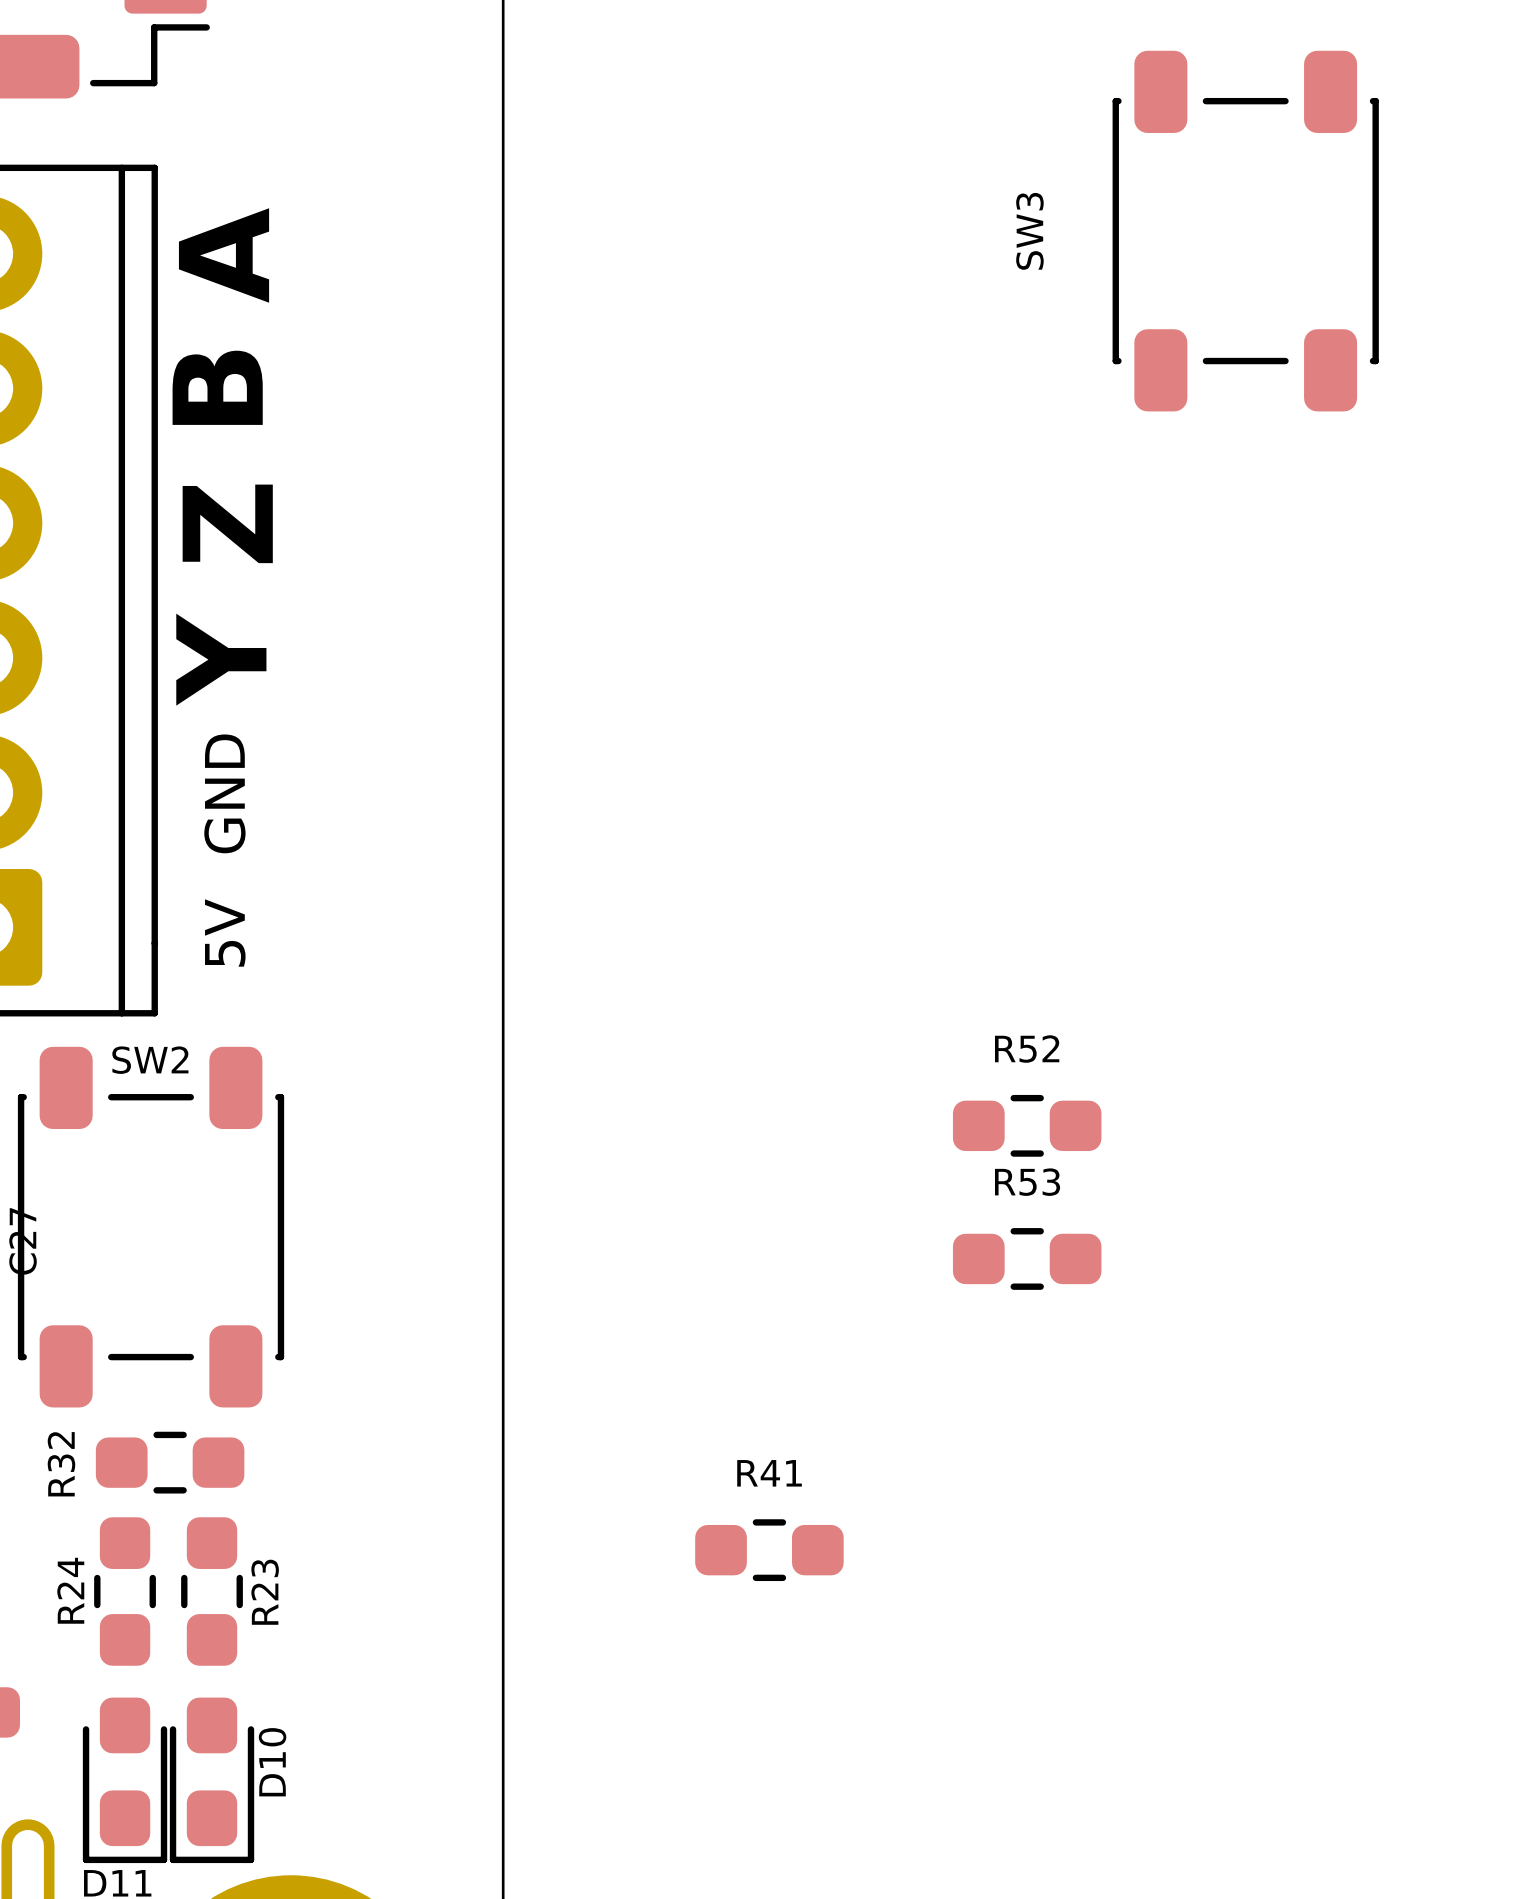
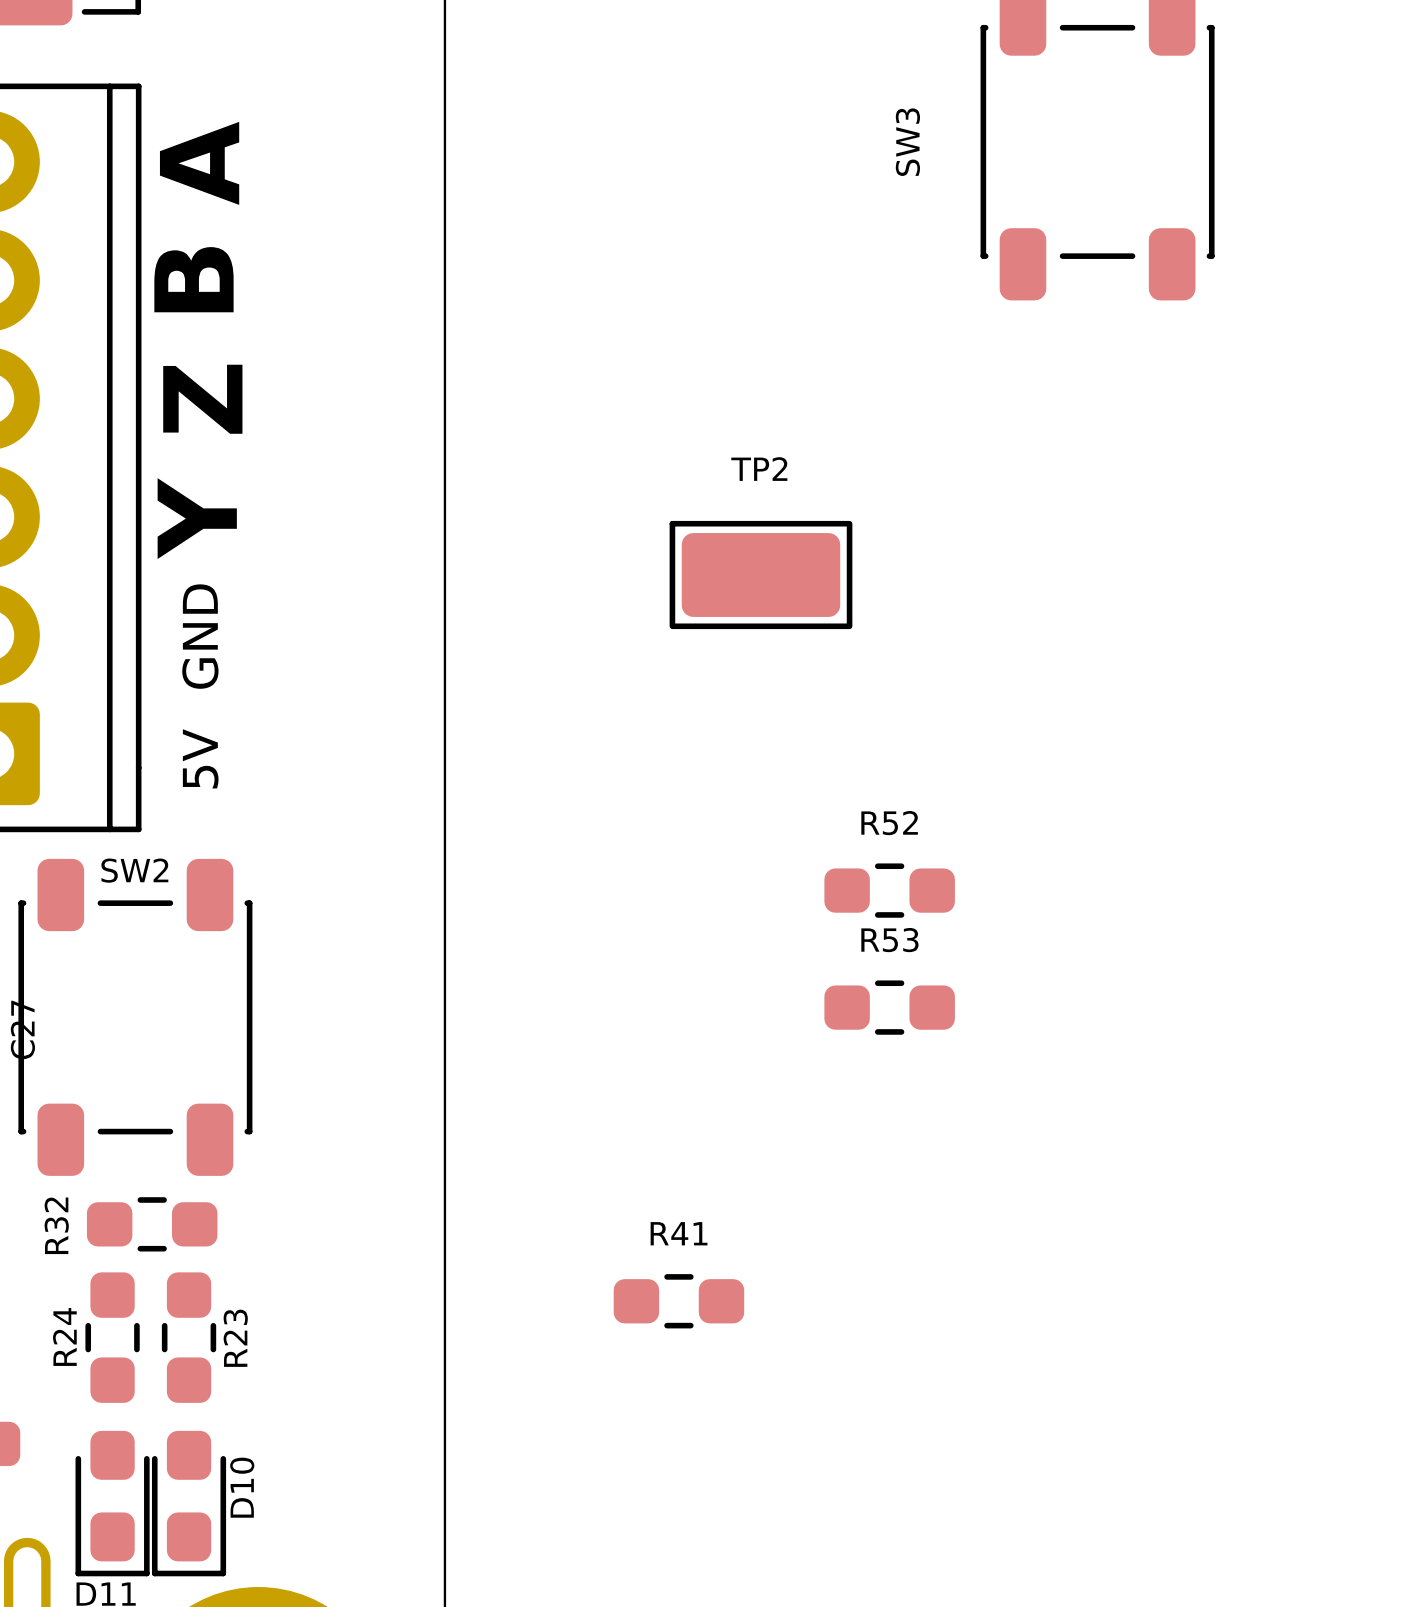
TP2: none -> (760, 575)
R52 position: (1027, 1125) -> (889, 890)
R53 position: (1027, 1258) -> (889, 1007)

